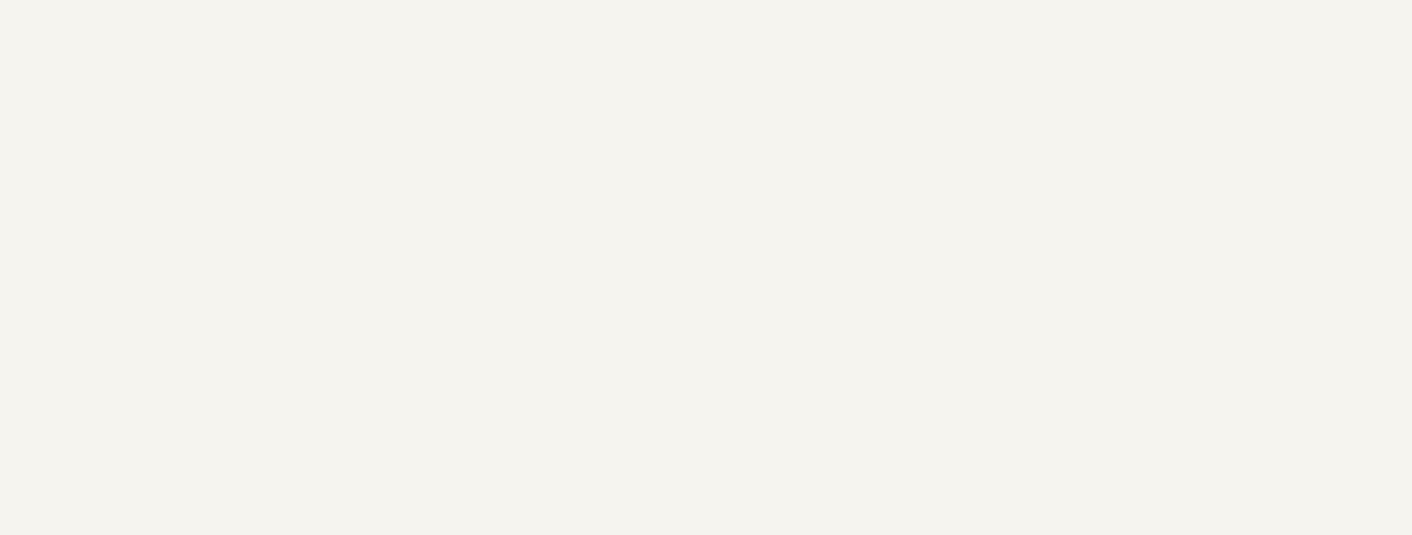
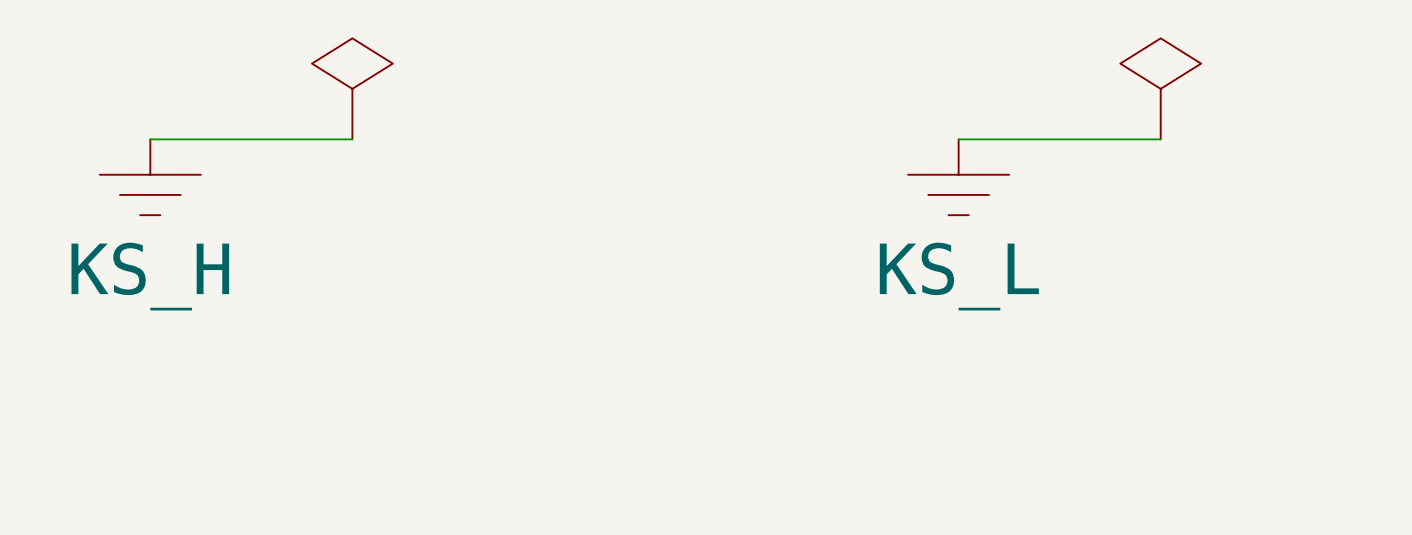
power symbol: none -> (352, 88)
power symbol: none -> (1160, 88)
wire: none -> (150, 139) (352, 139)
wire: none -> (958, 139) (1160, 139)
power symbol: none -> KS_H (150, 177)
power symbol: none -> KS_L (958, 177)

